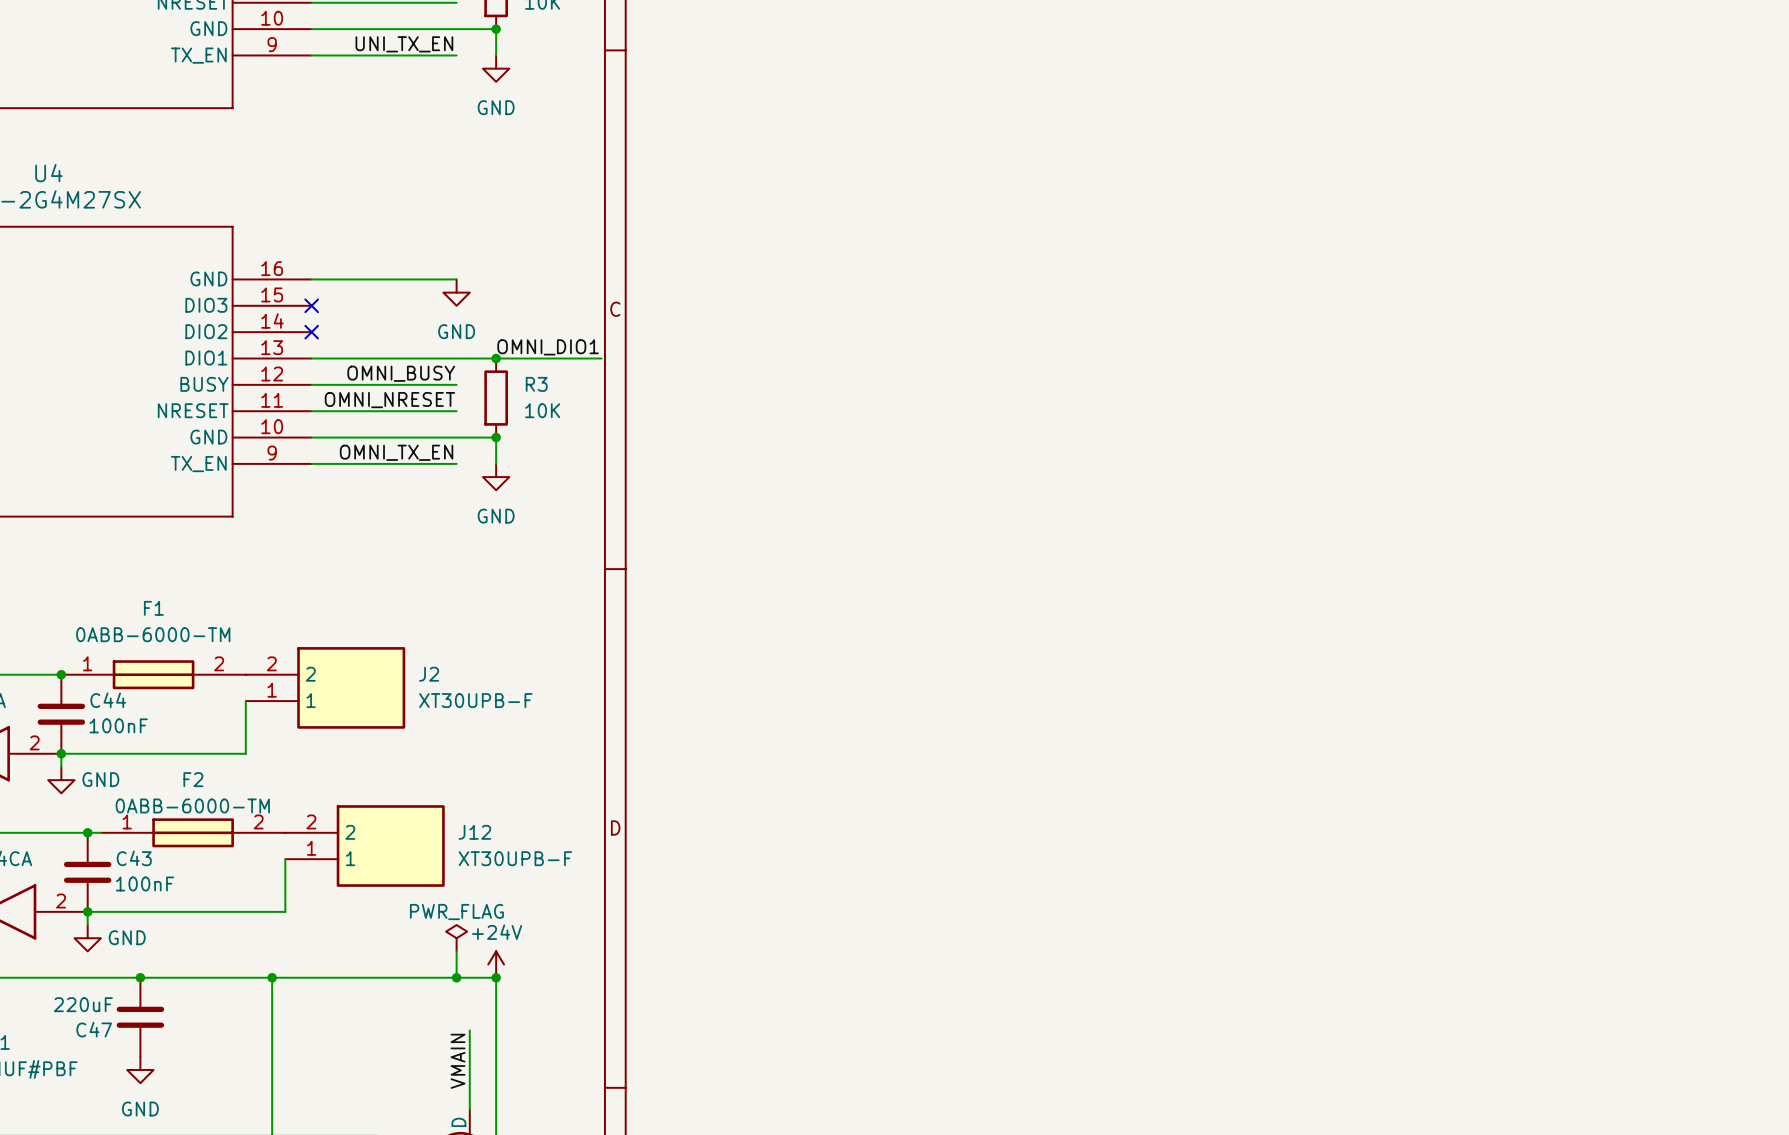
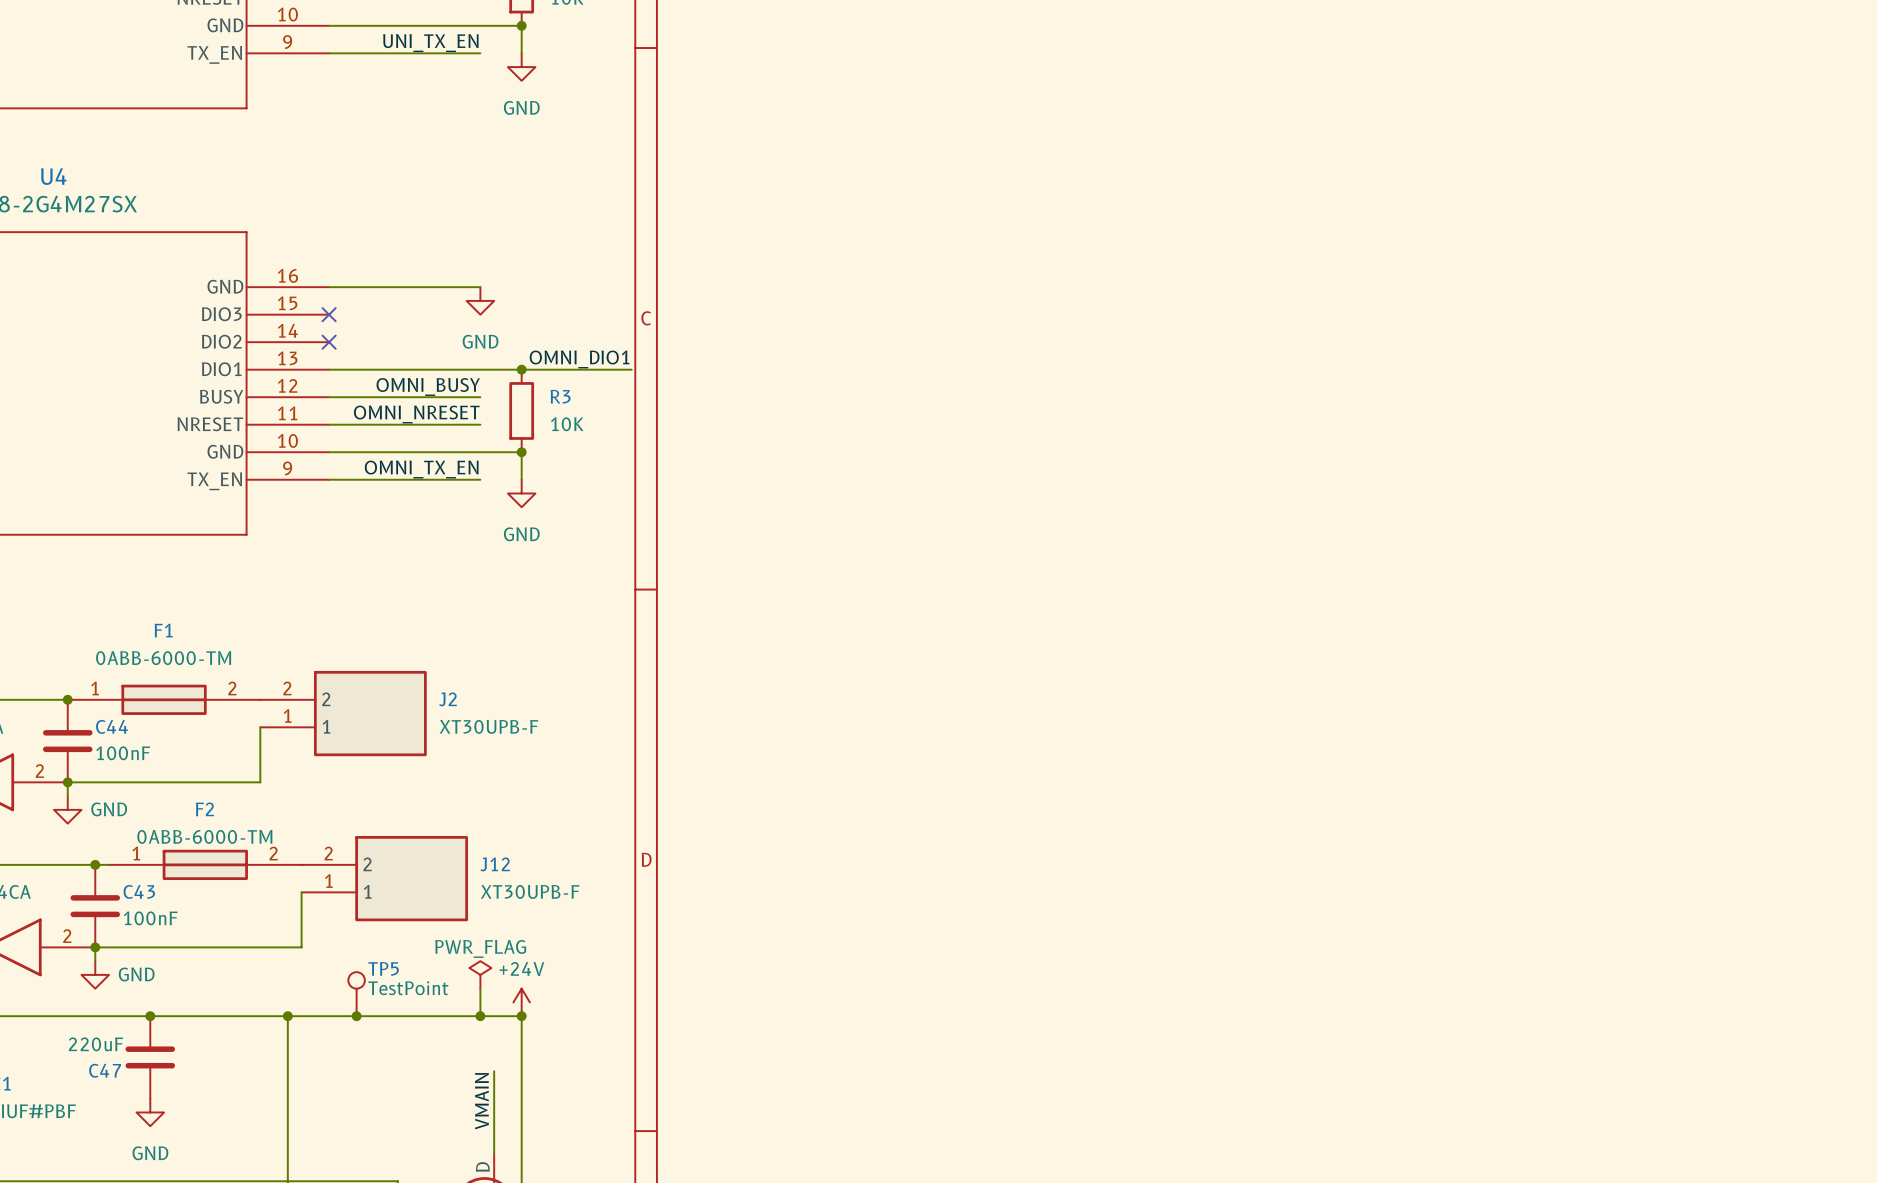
TP5: none -> TestPoint (356, 994)
junction: none -> (356, 1016)

